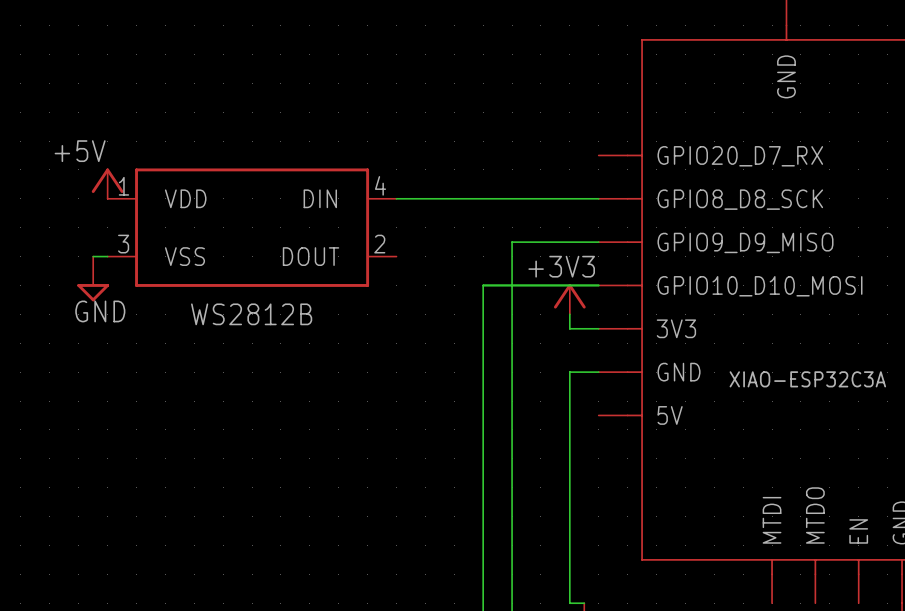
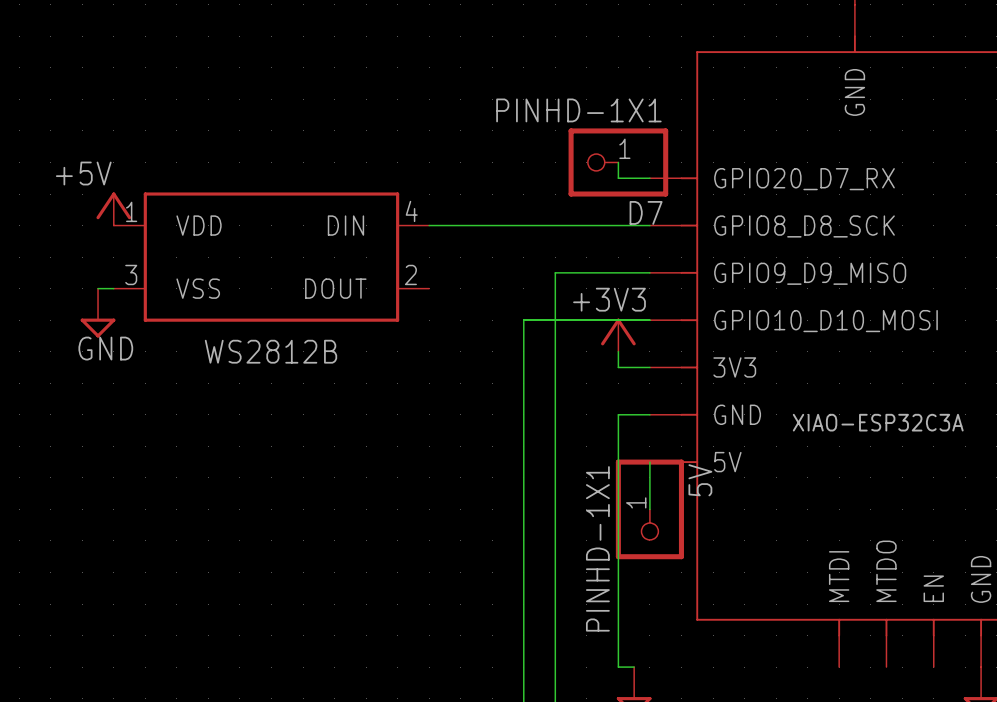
wire: none -> (618, 162) (618, 178) (649, 178)
D7: none -> PINHD-1X1 (618, 162)
wire: none -> (649, 462) (649, 509)
5V: none -> PINHD-1X1 (649, 509)

